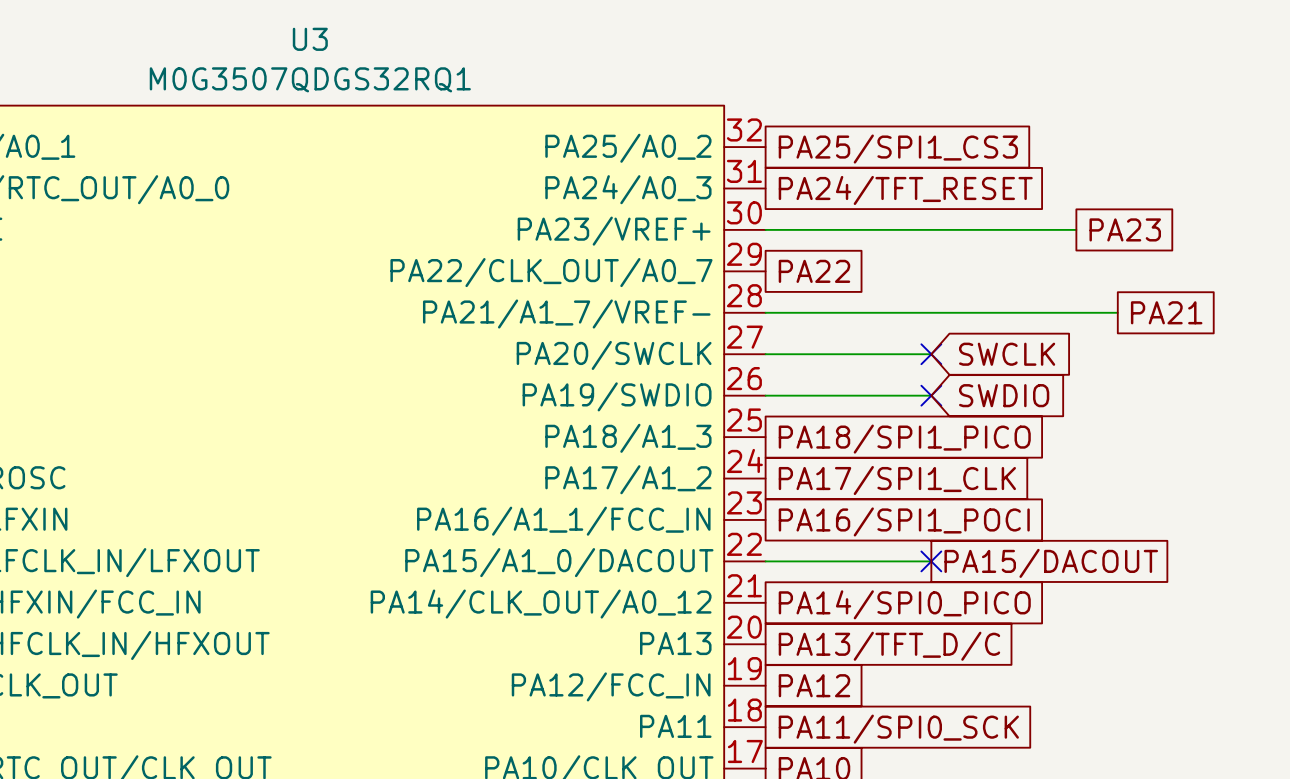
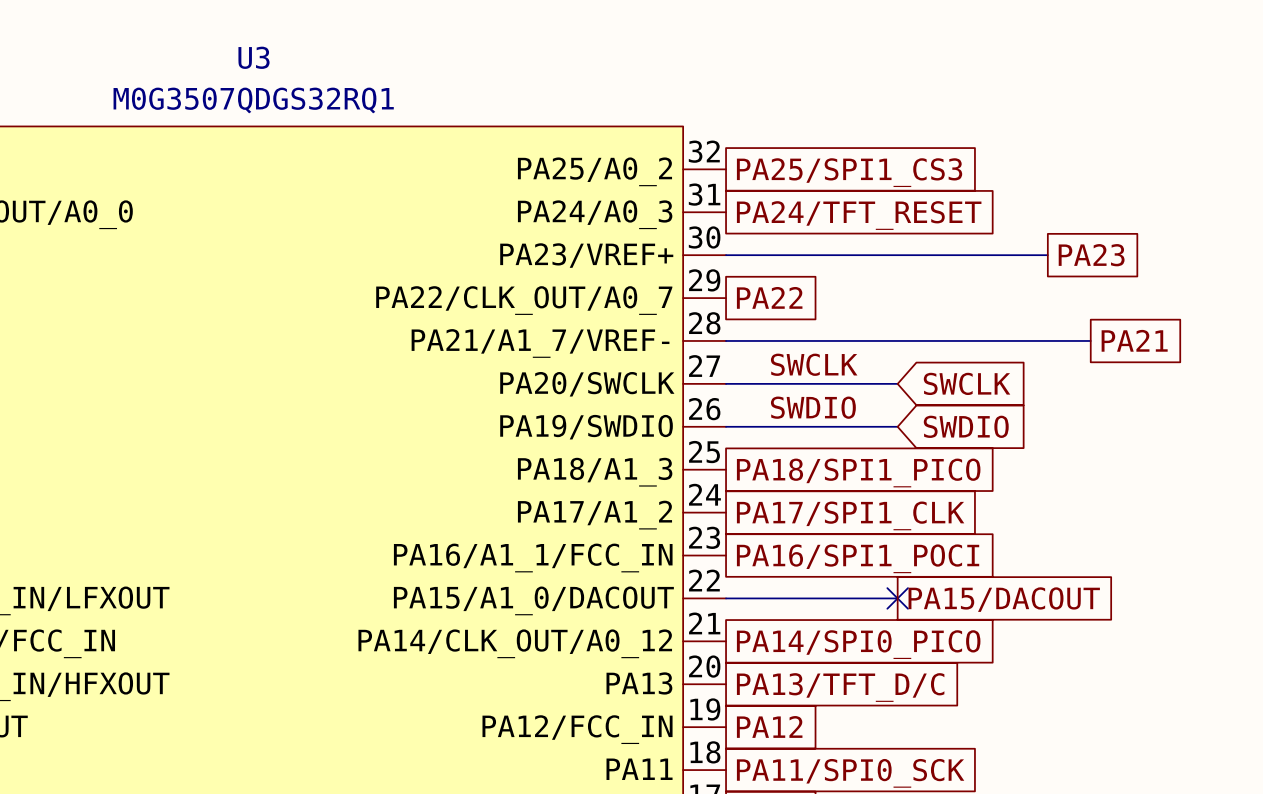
label: none -> SWCLK (814, 364)
no-connect mark: (931, 354) -> none
label: none -> SWDIO (813, 407)
no-connect mark: (931, 395) -> none

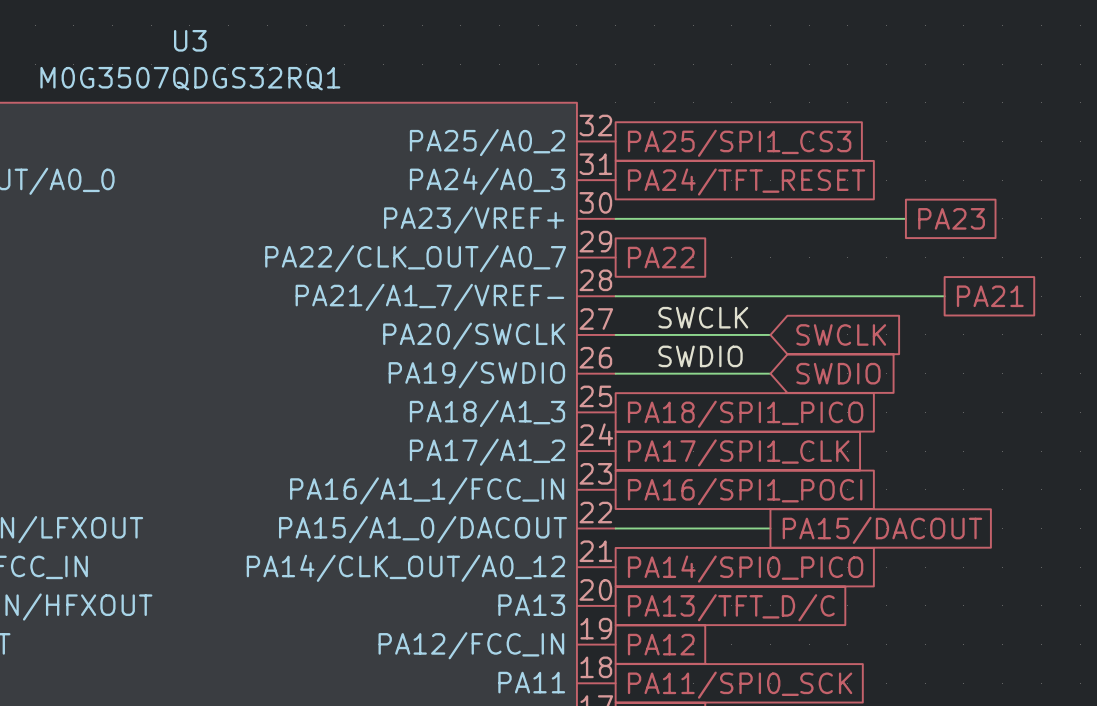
no-connect mark: (897, 598) -> none

